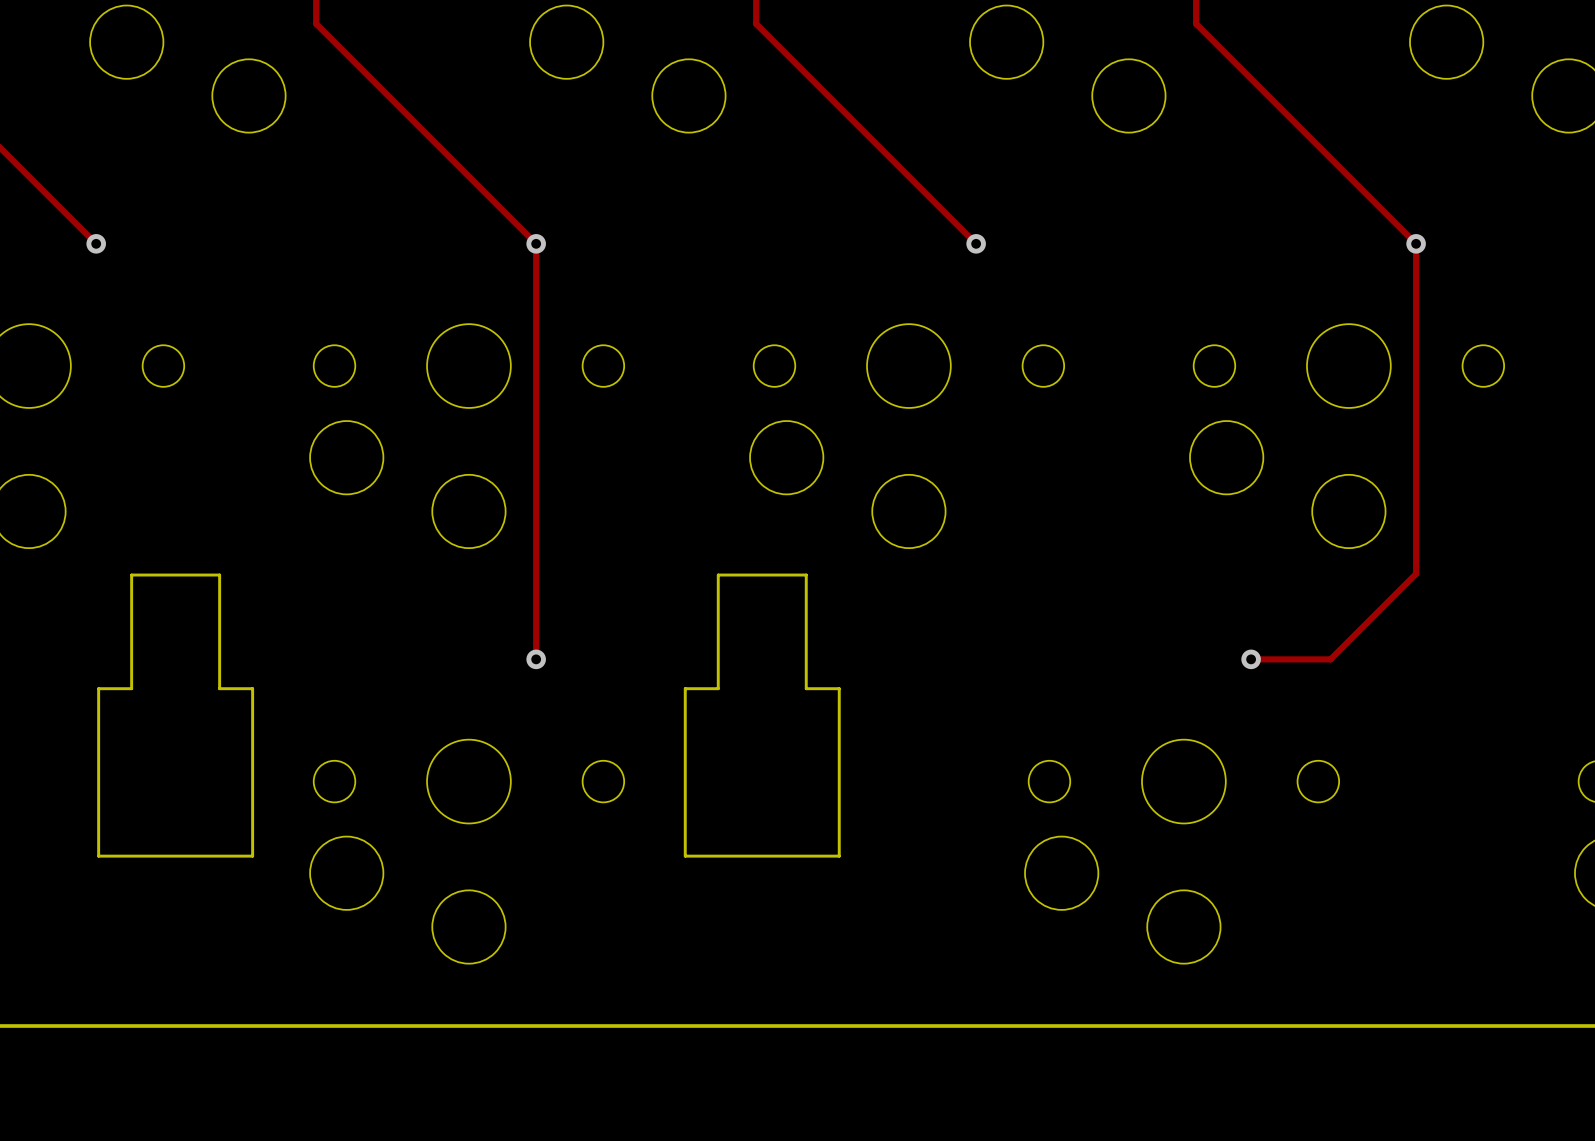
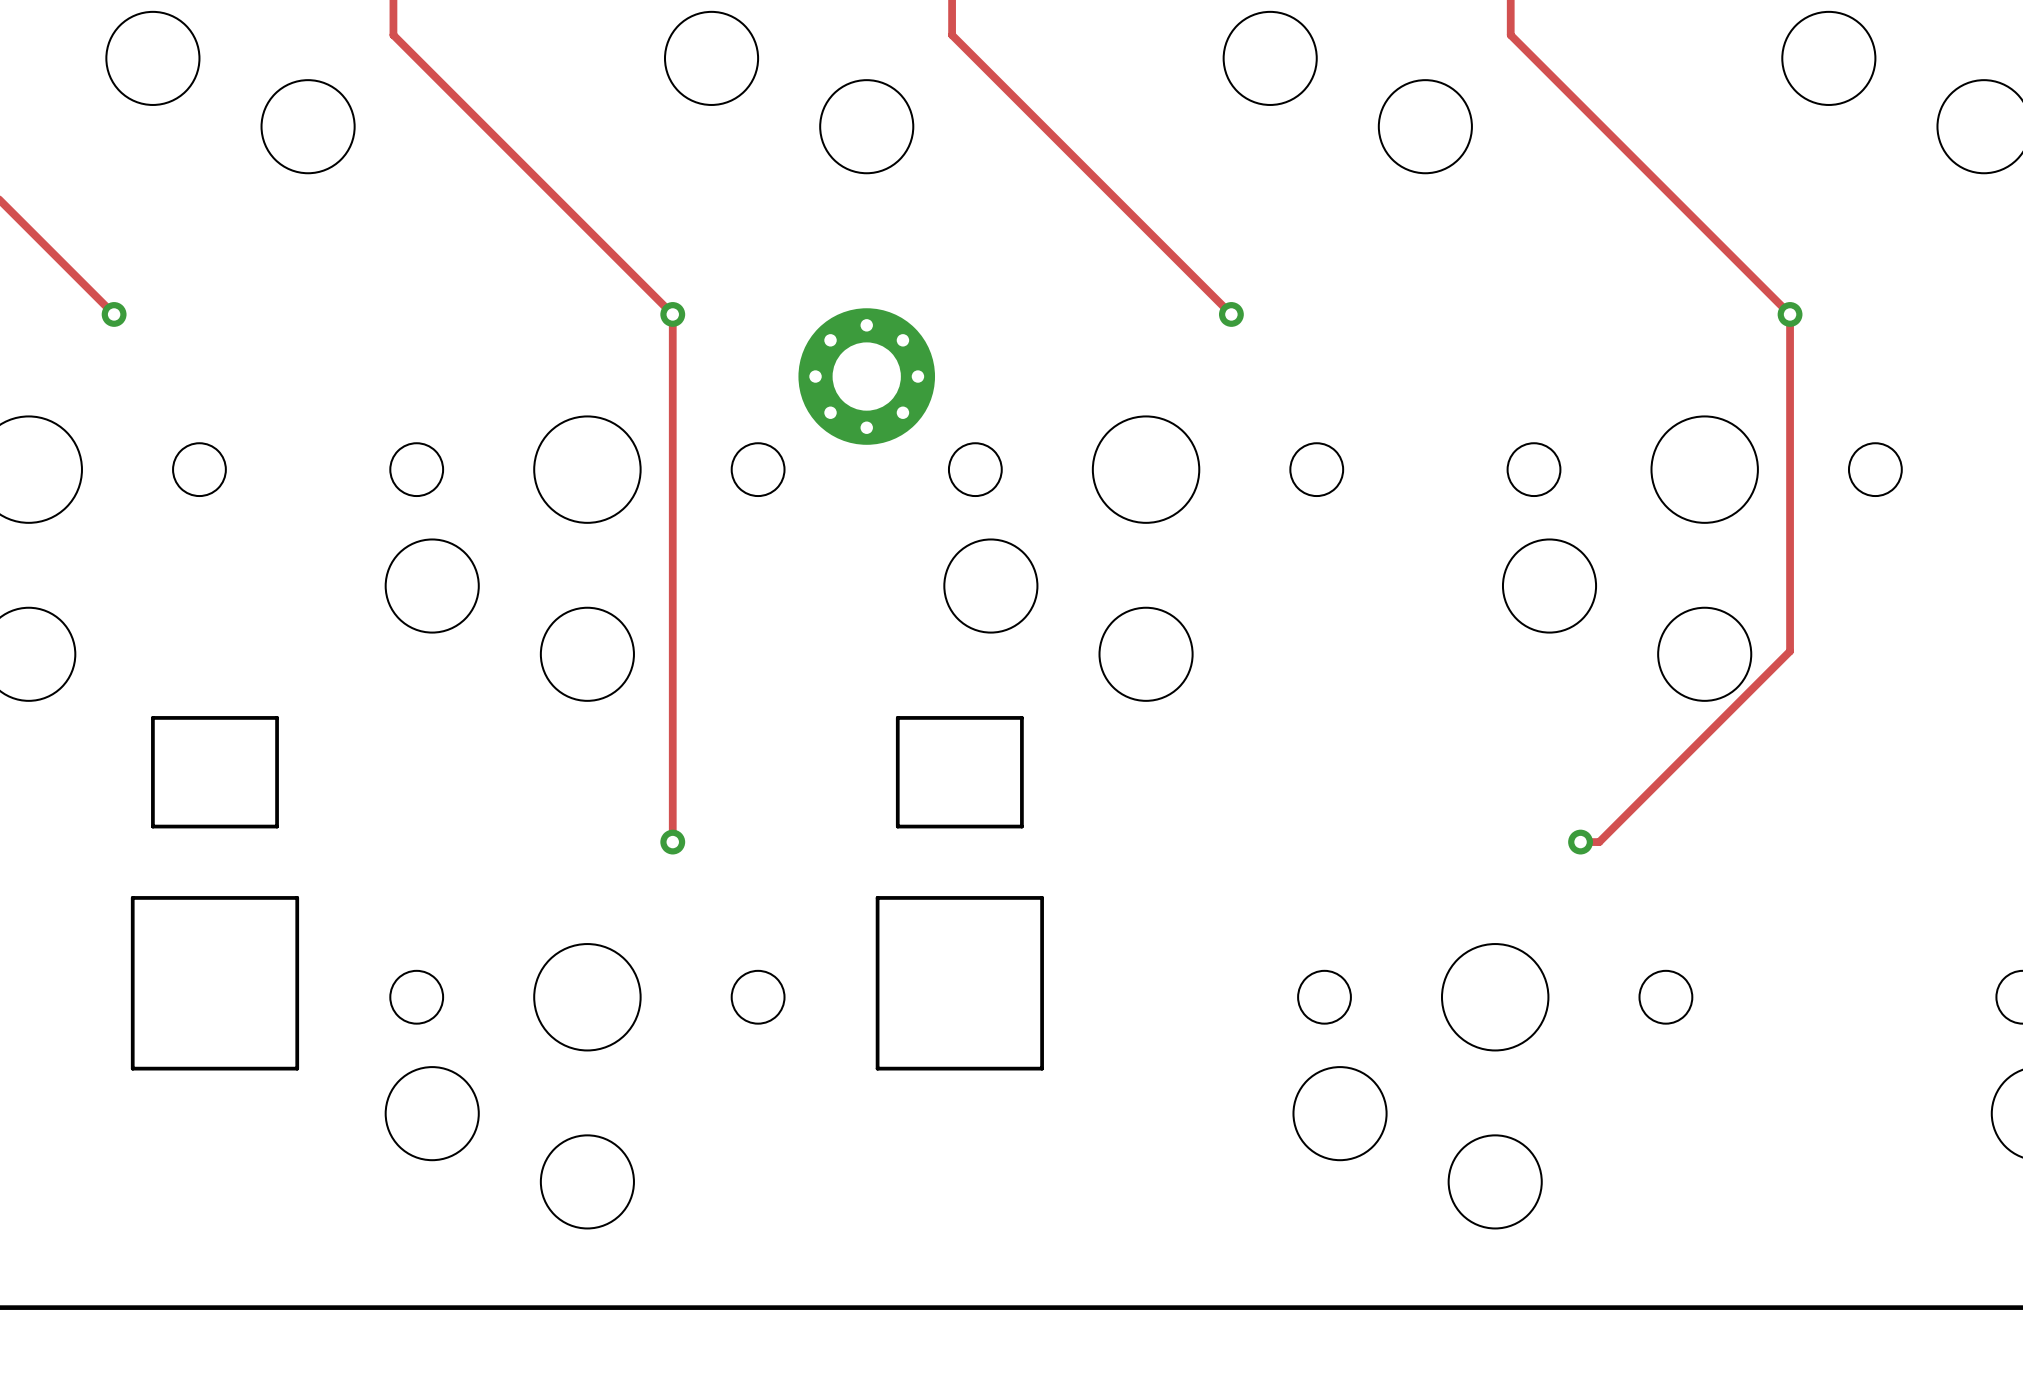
part: none -> (866, 376)
track: (1416, 509) (1416, 573) (1330, 659) (1265, 659) -> (1790, 651) (1599, 842)
drawing shape: [97, 573, 841, 858] -> [130, 716, 1044, 1071]

